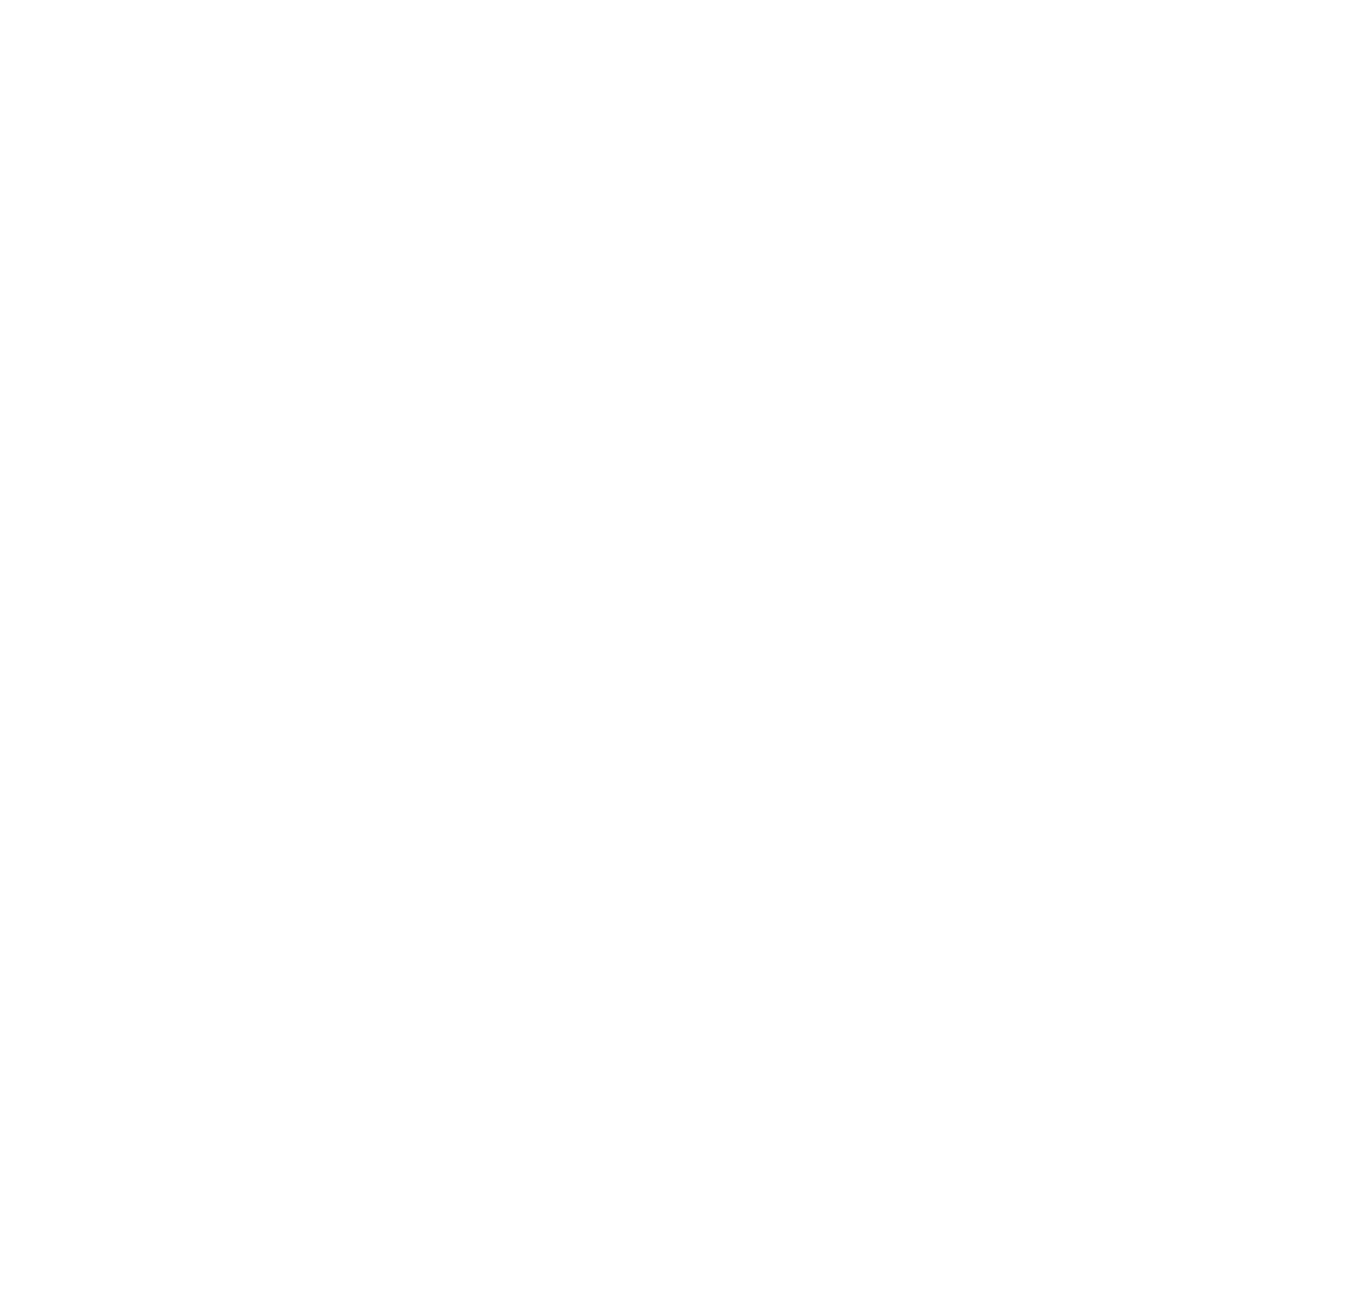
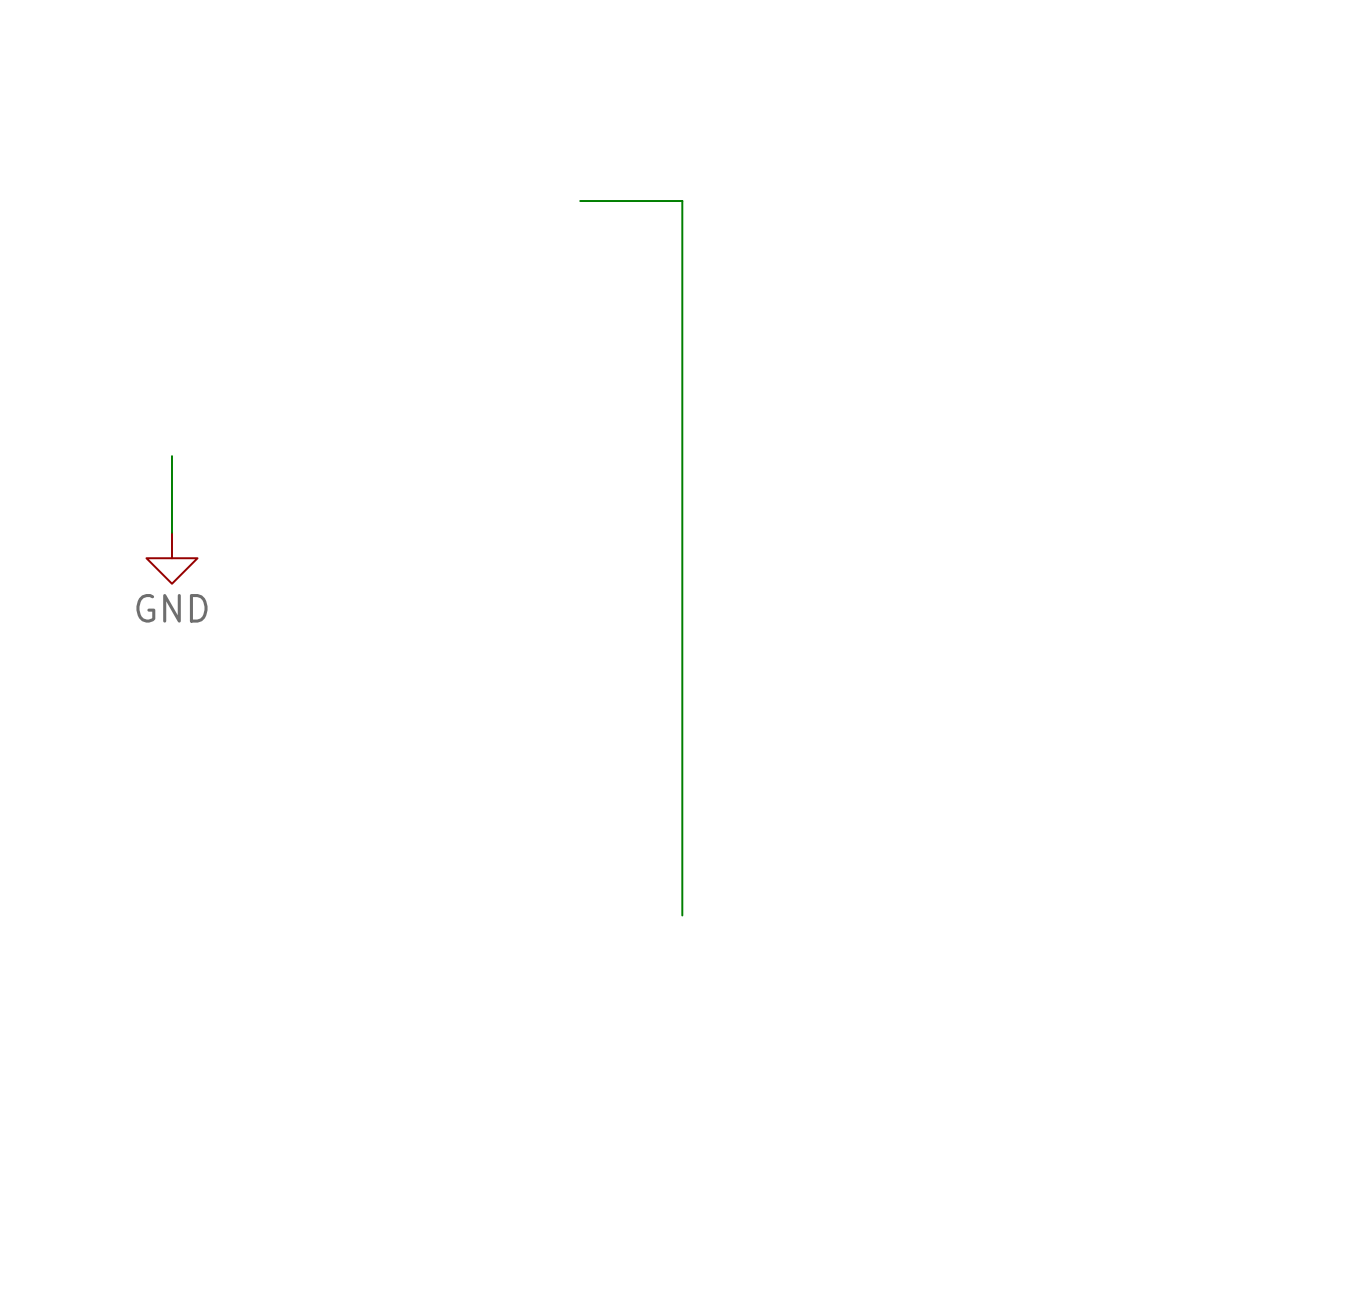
wire: none -> (580, 201) (682, 201) (682, 915)
wire: none -> (171, 456) (171, 532)
power symbol: none -> GND (171, 558)

